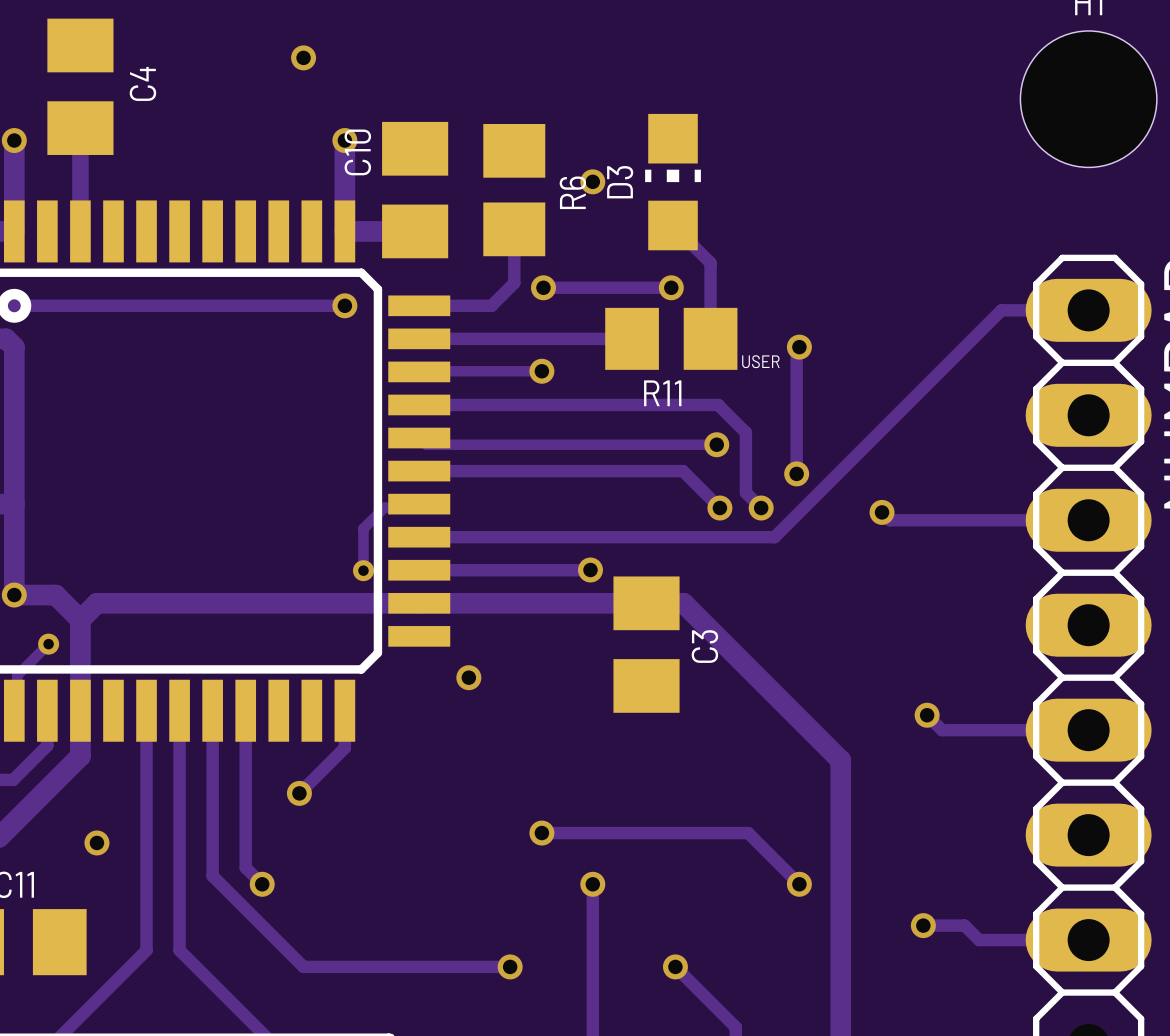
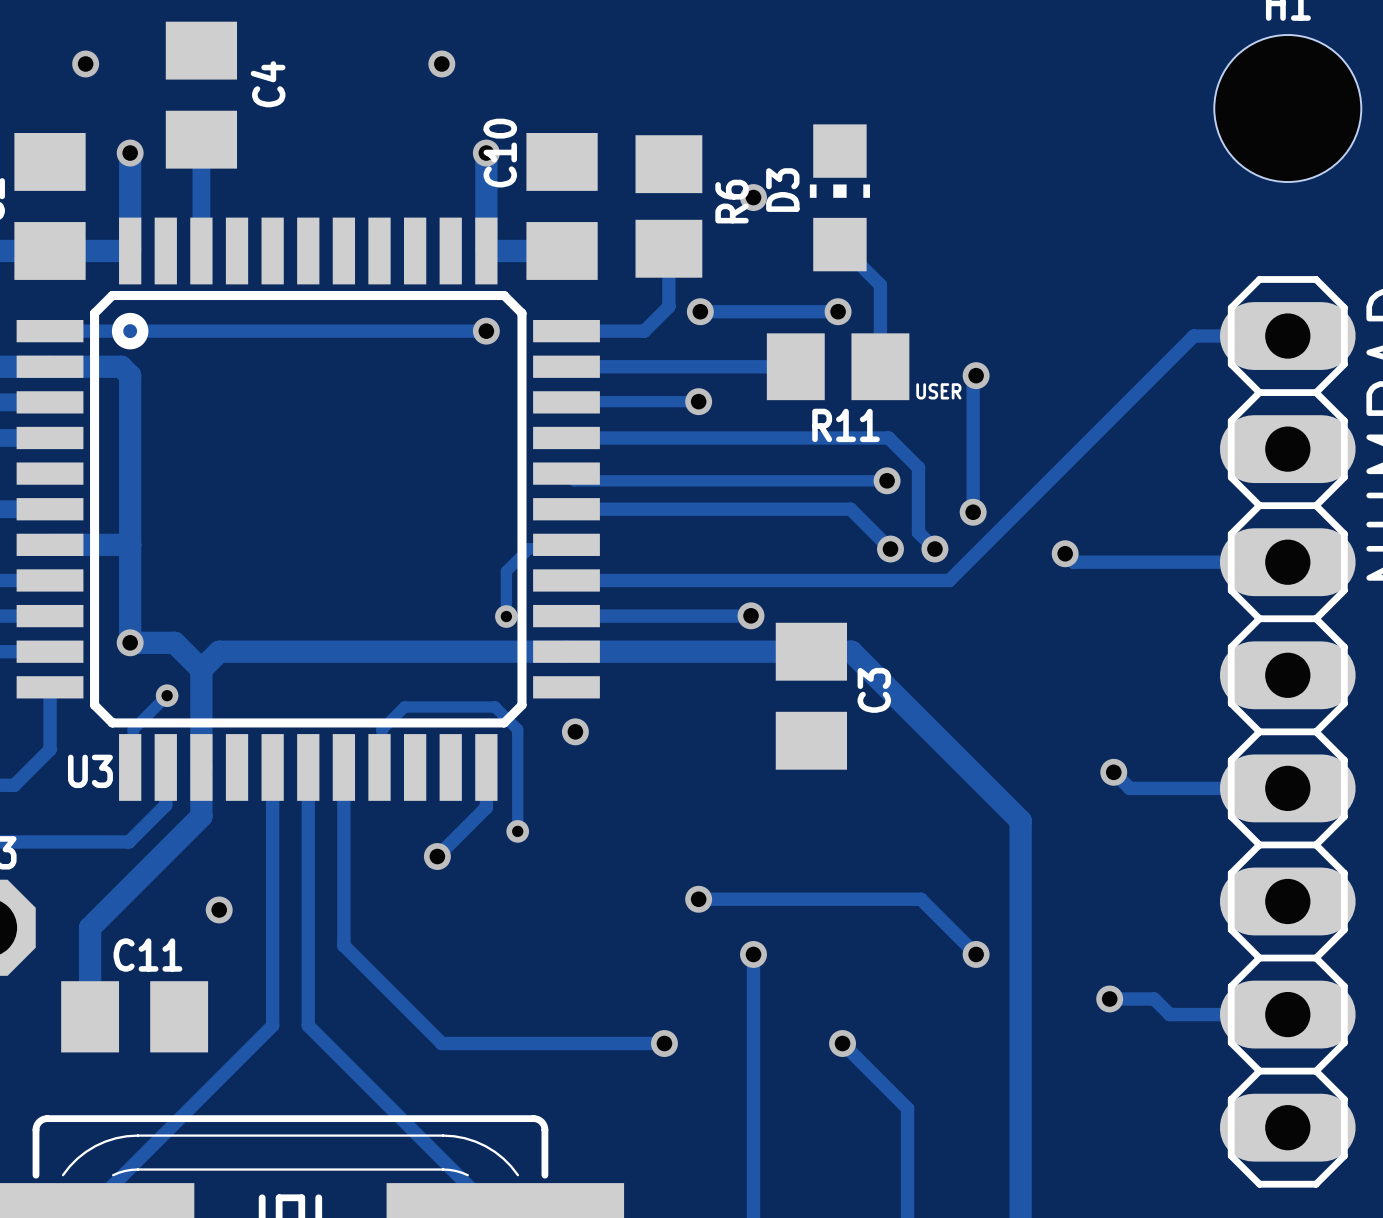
via position: (468, 677) -> (575, 731)
track: (245, 710) (245, 867) (262, 884) -> (379, 767) (381, 763) (381, 729) (404, 707) (495, 707) (517, 729) (517, 831)
via: none -> (517, 831)
via: (262, 884) -> none

